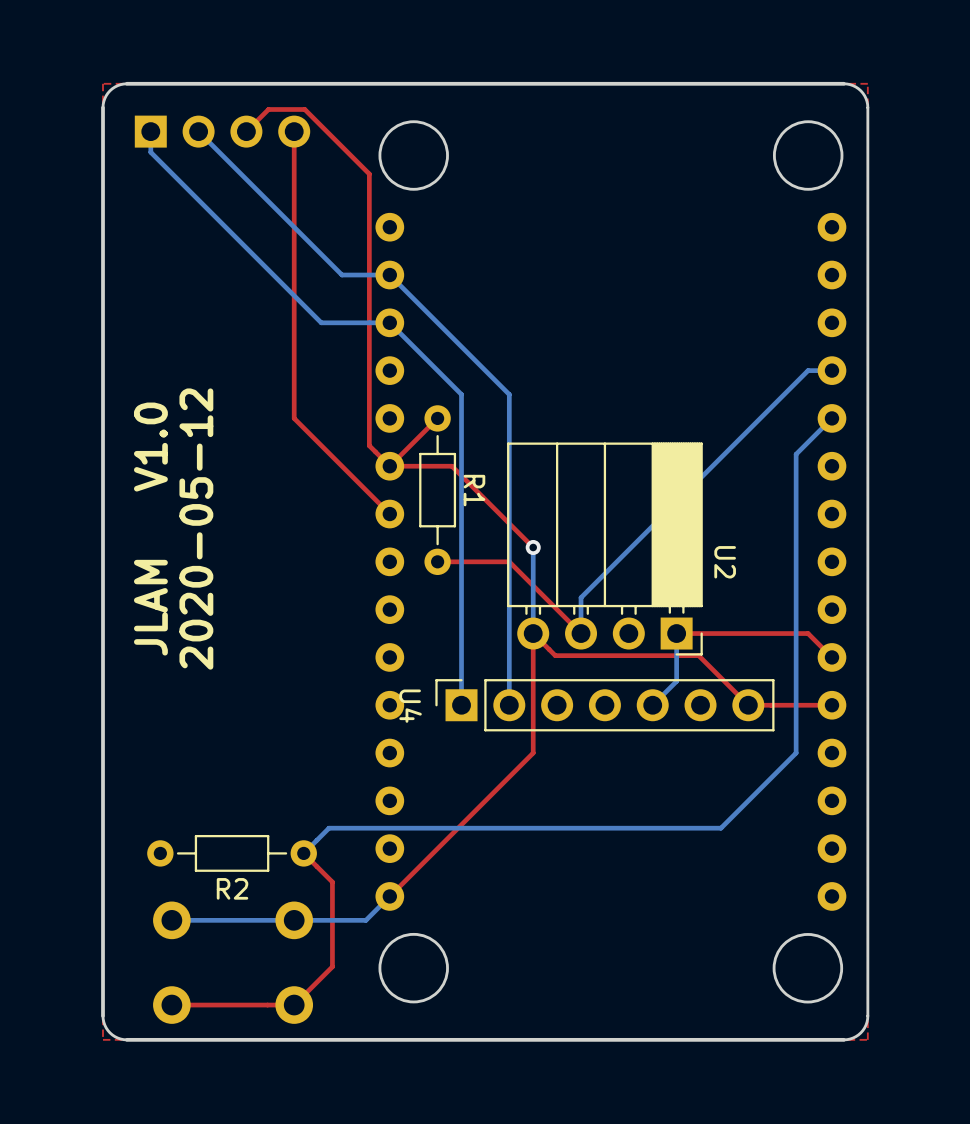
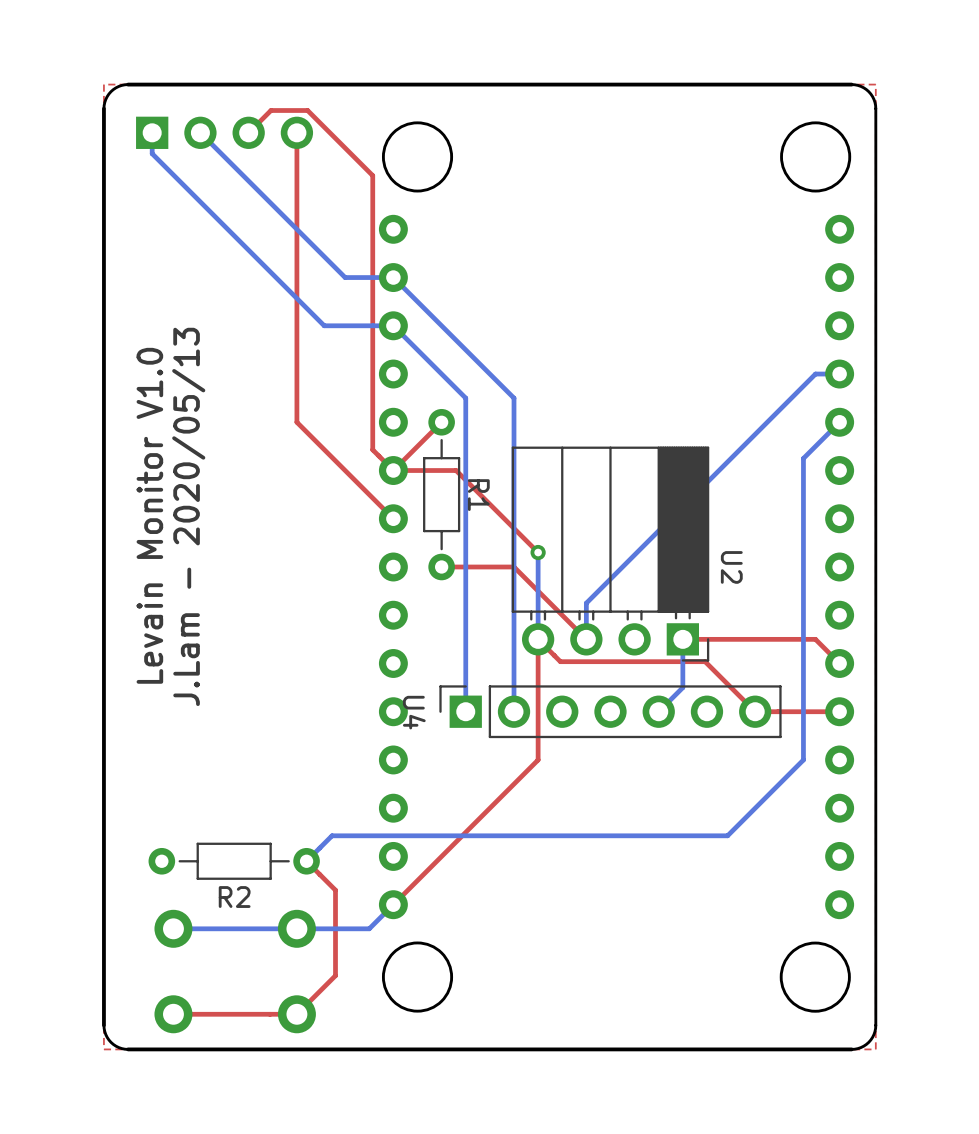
text: none -> J.Lam - 2020/05/13 (188, 516)
text: JLAM V1.0 (150, 529) -> Levain Monitor V1.0 (149, 515)
text: 2020-05-12 (196, 529) -> none

